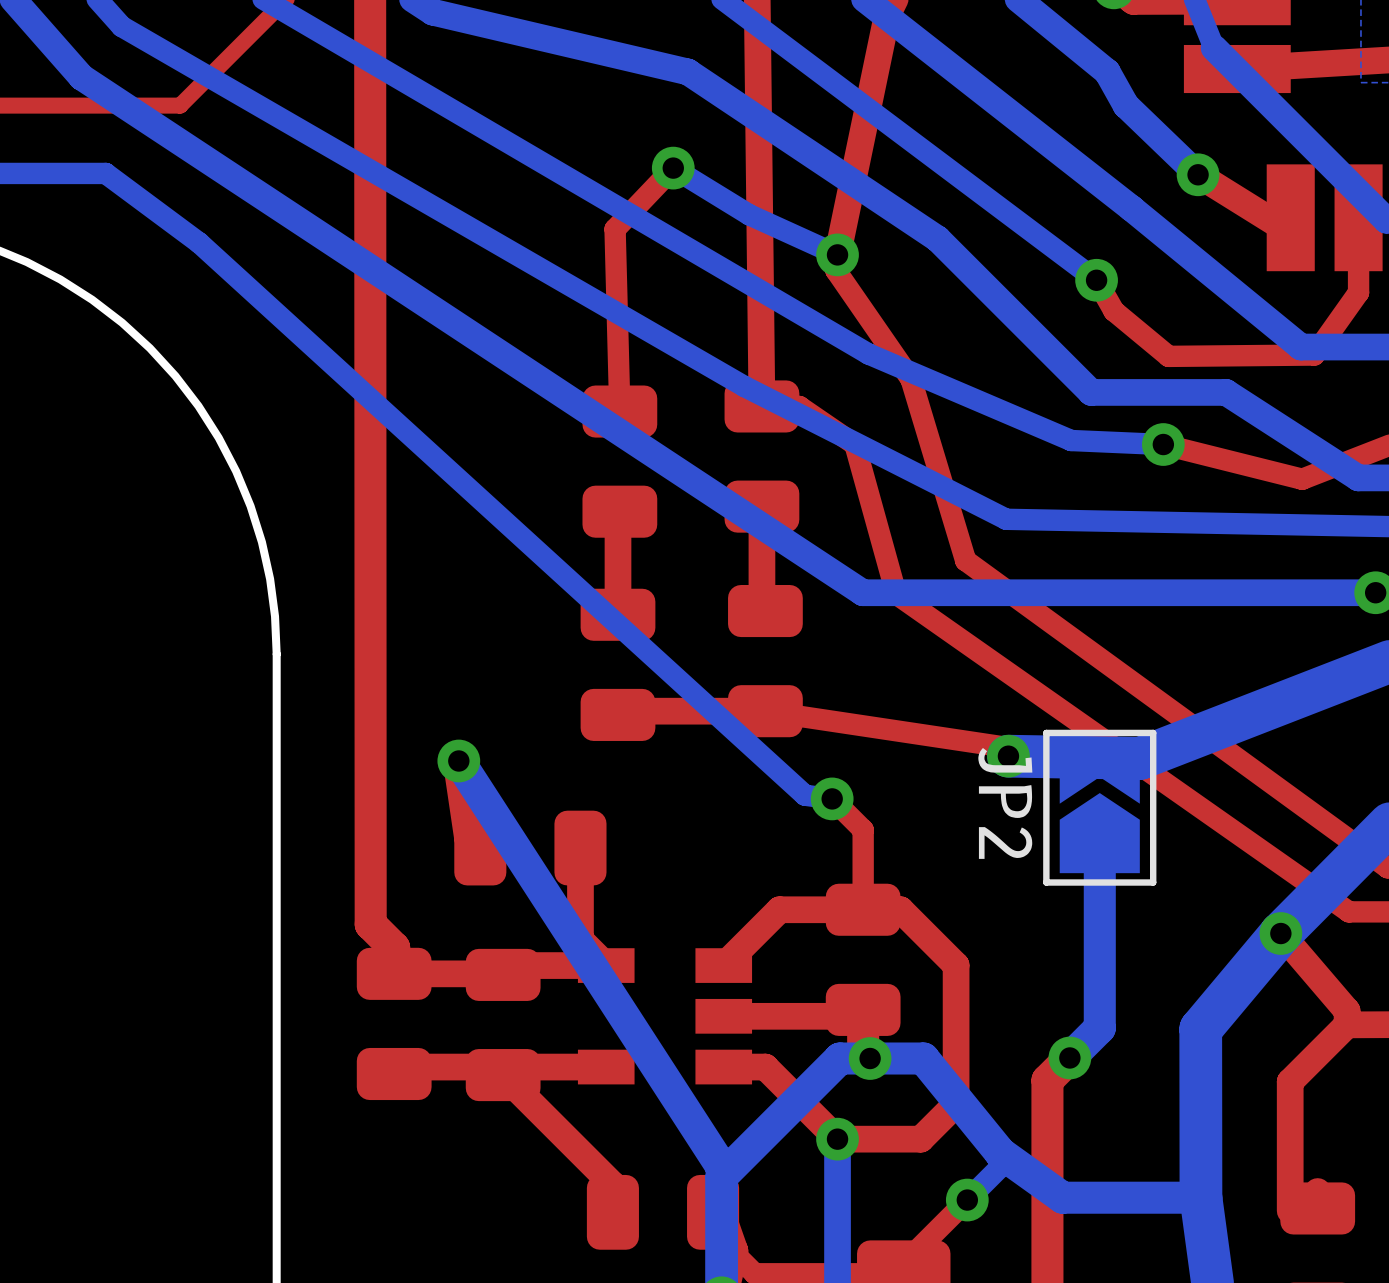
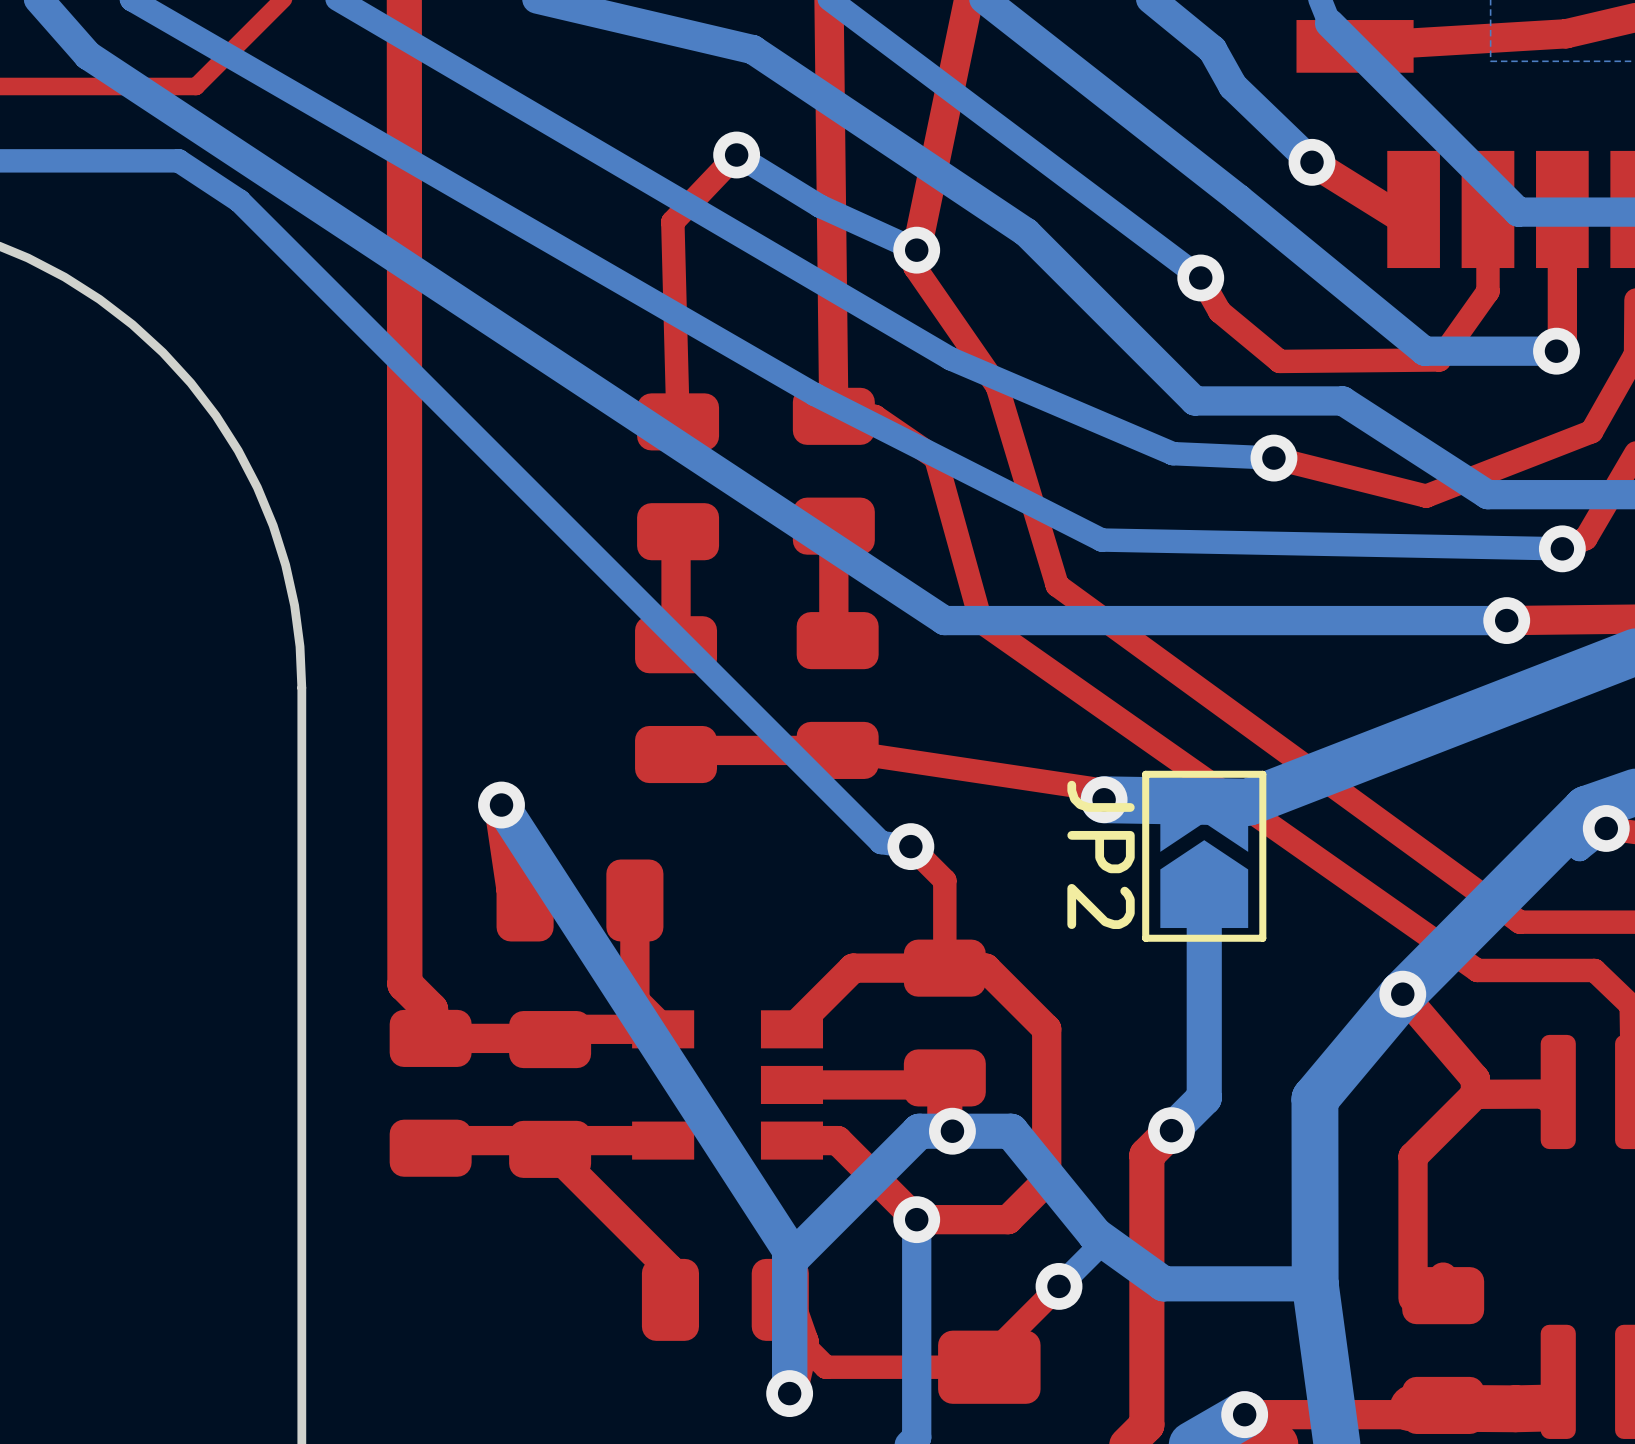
bottom track: (105, 173) (199, 242) (804, 795) -> (114, 160) (178, 160) (239, 200) (880, 842)

